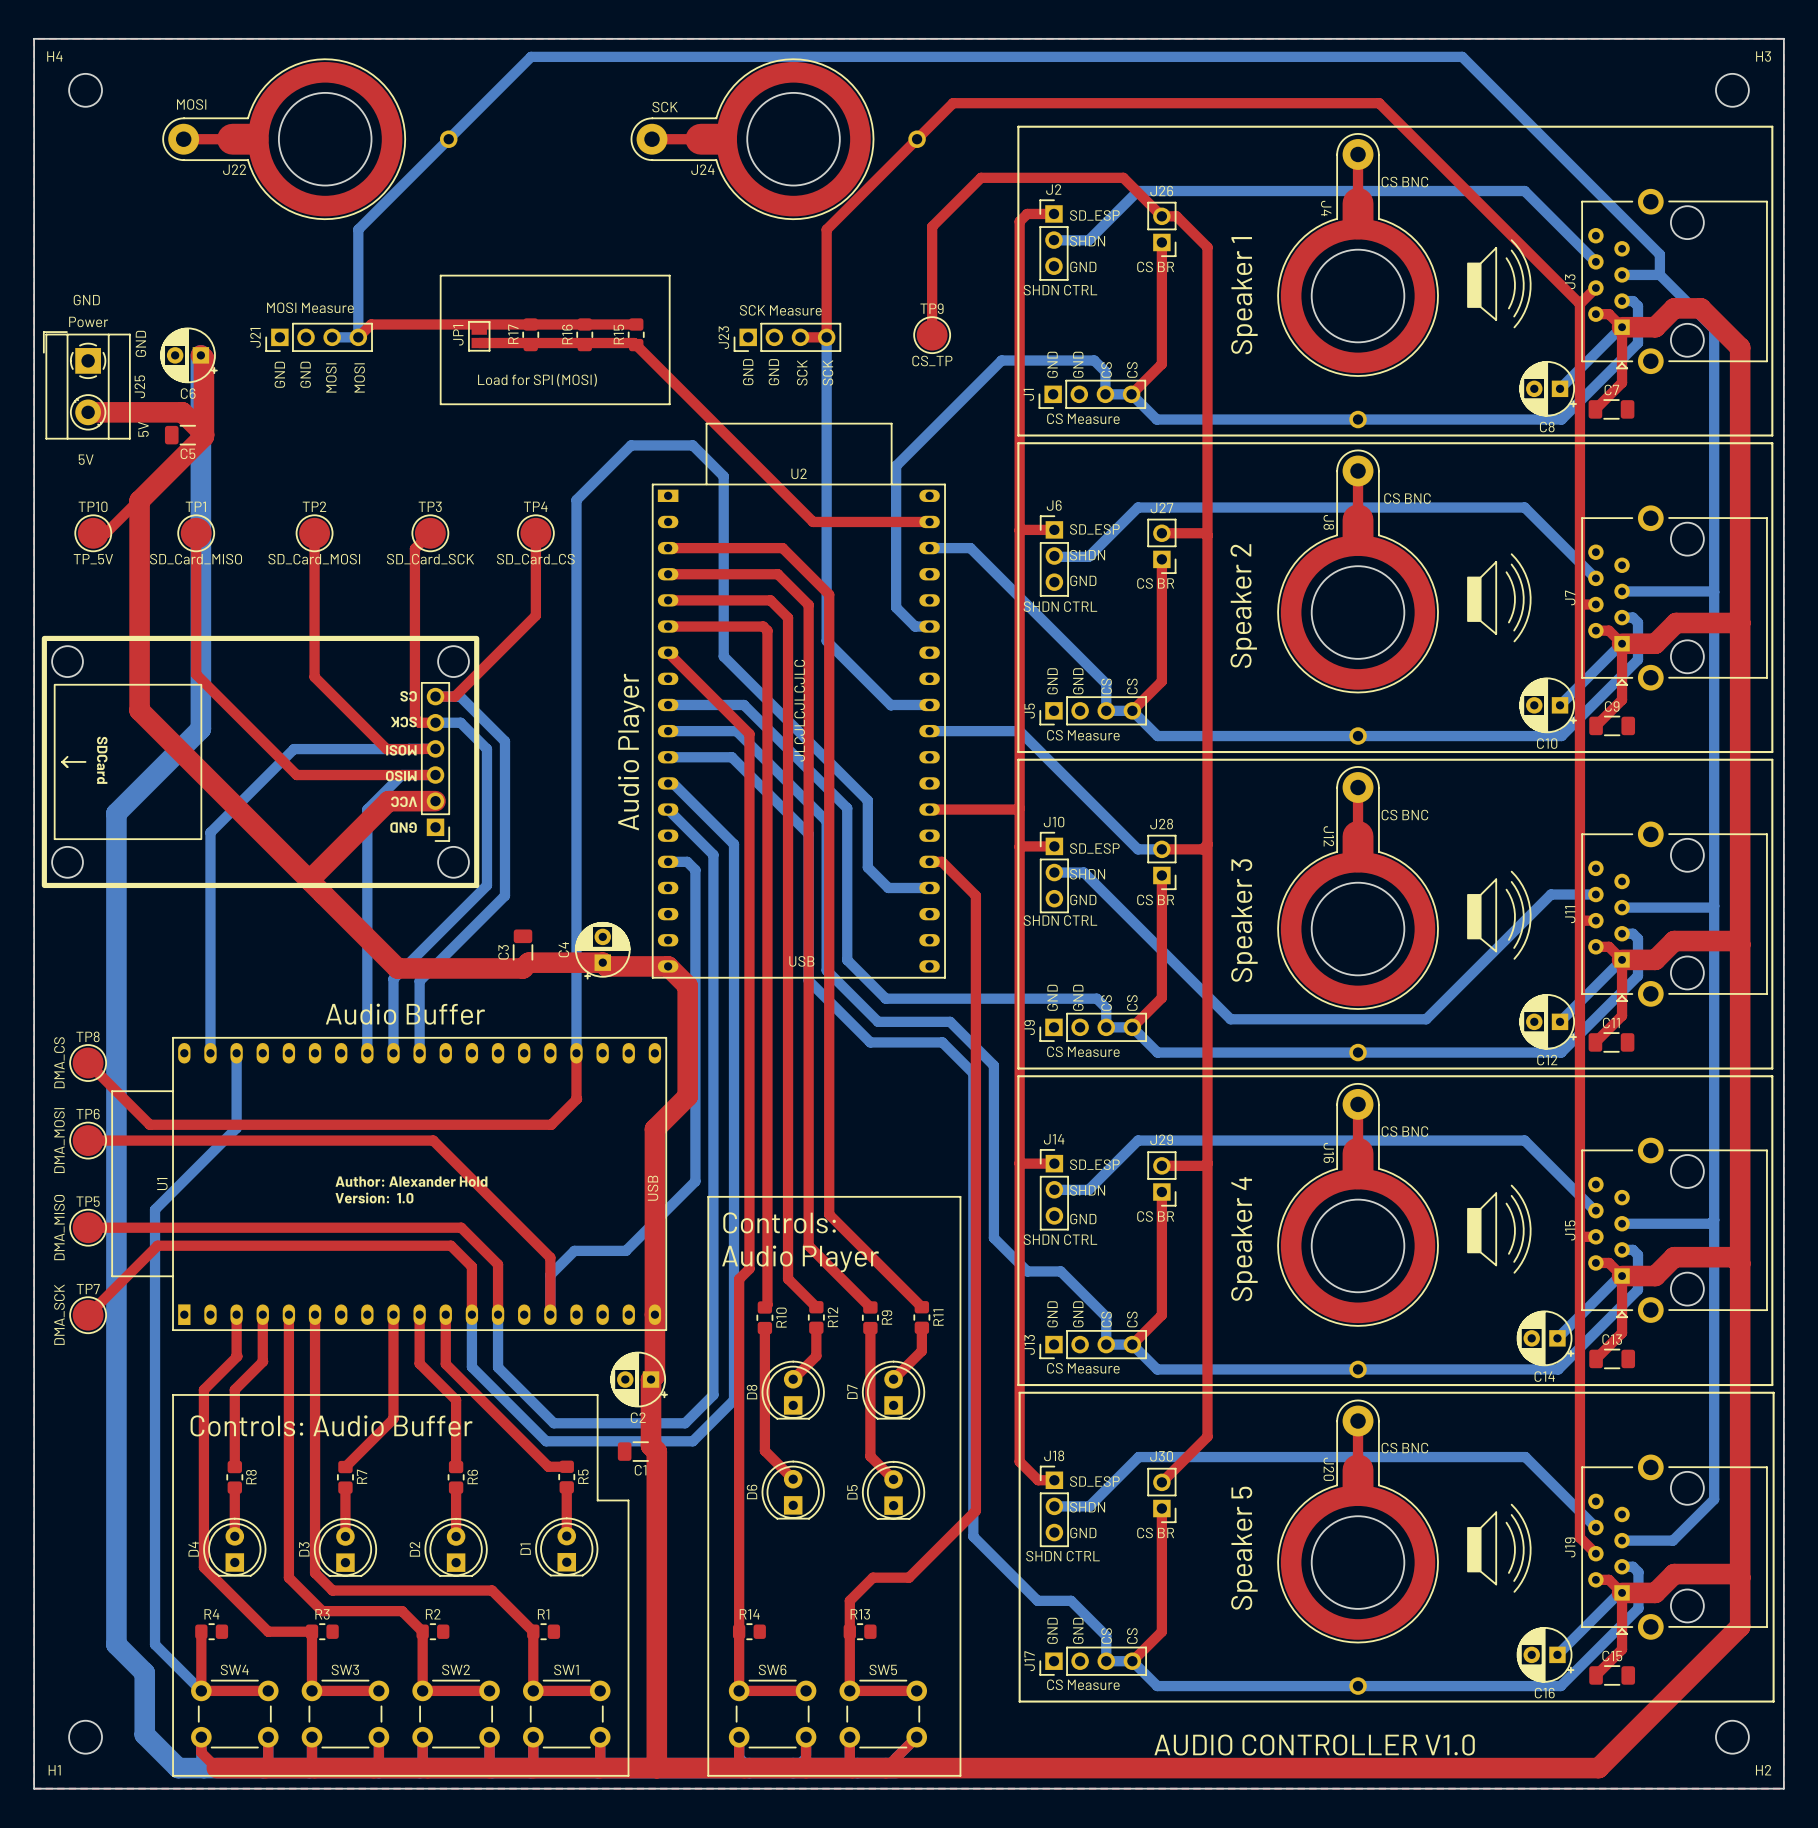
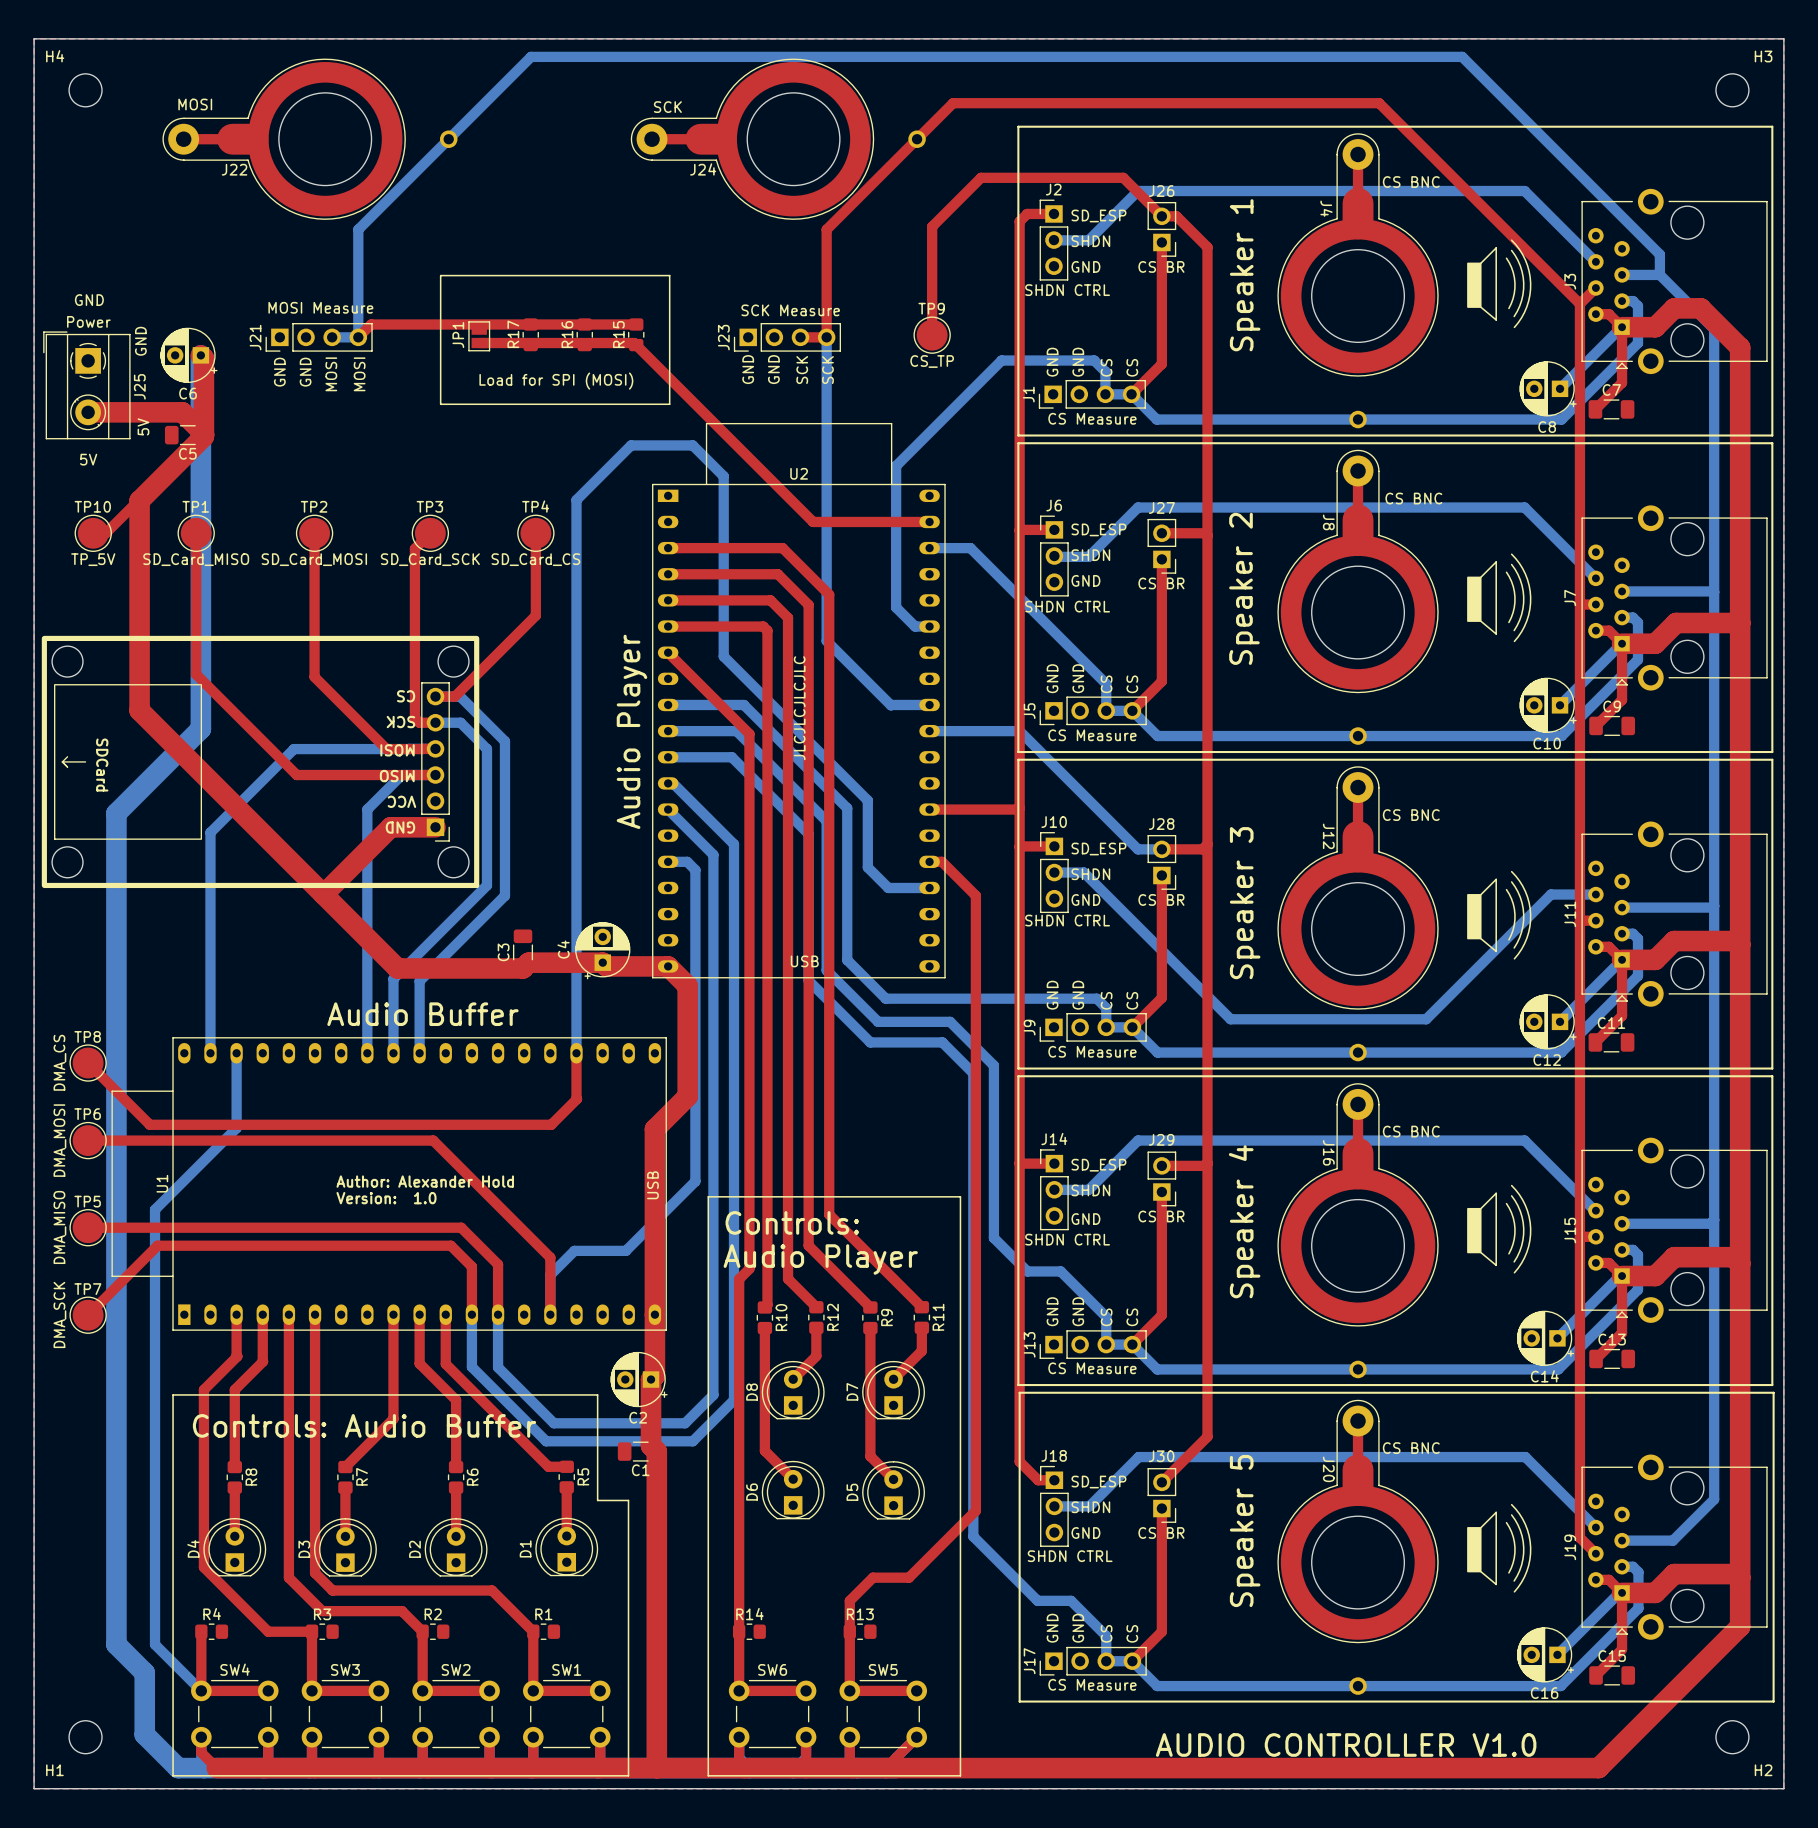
top track: (435, 801) (388, 801) (309, 880) -> none
top track: none -> (435, 827) (390, 827) (323, 894)

